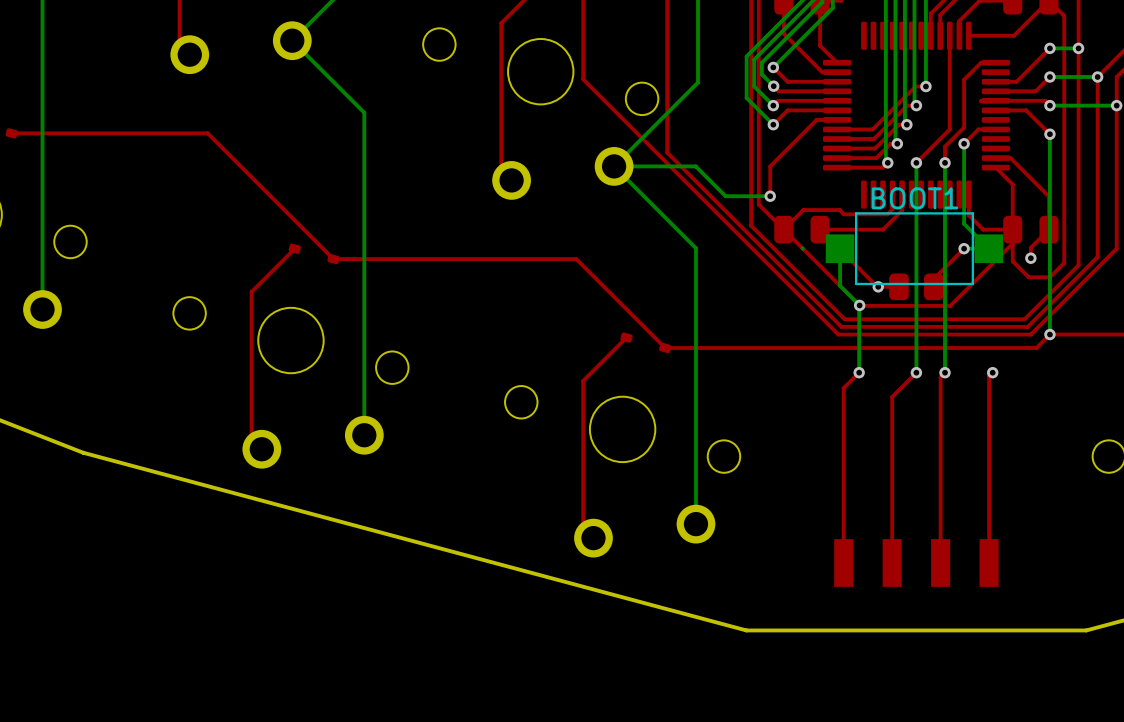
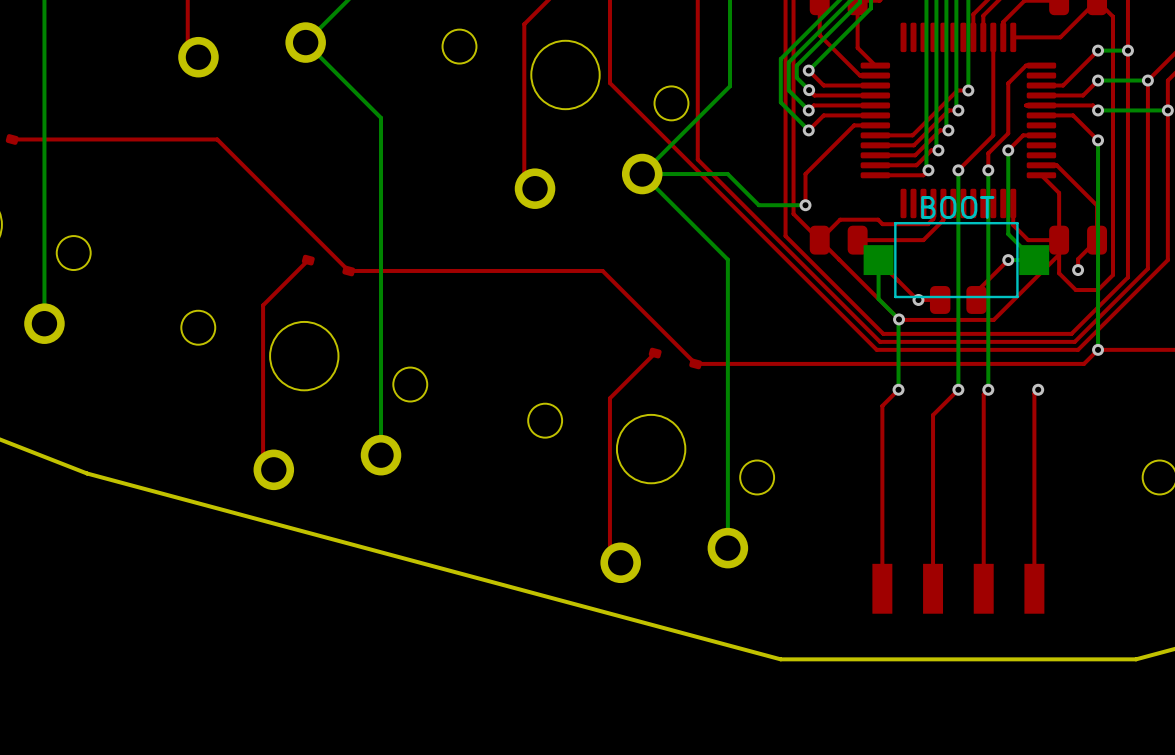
BOOT1 name: BOOT1 (914, 198) -> BOOT (957, 207)
bottom track: (802, 248) (802, 248) -> none

